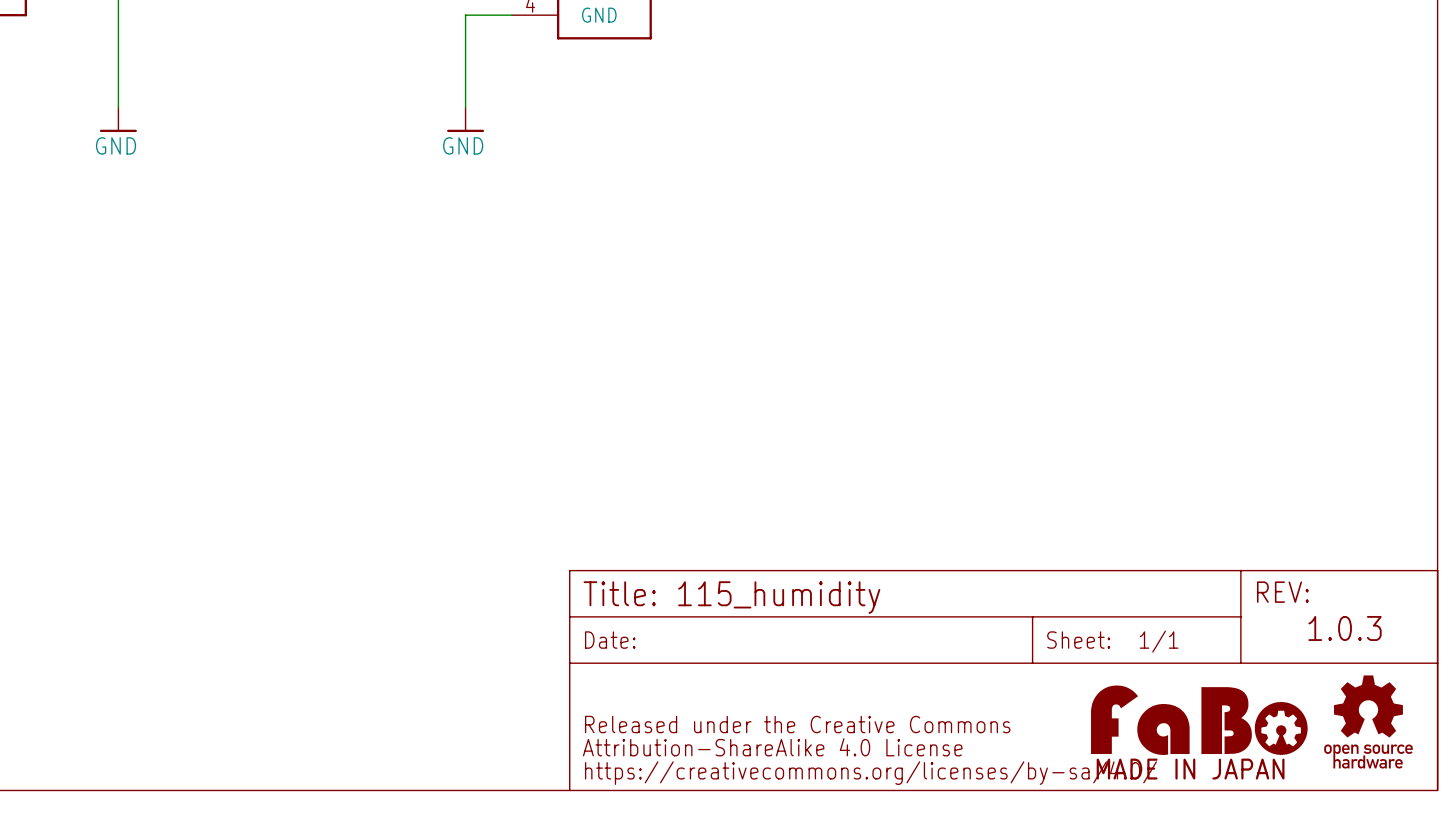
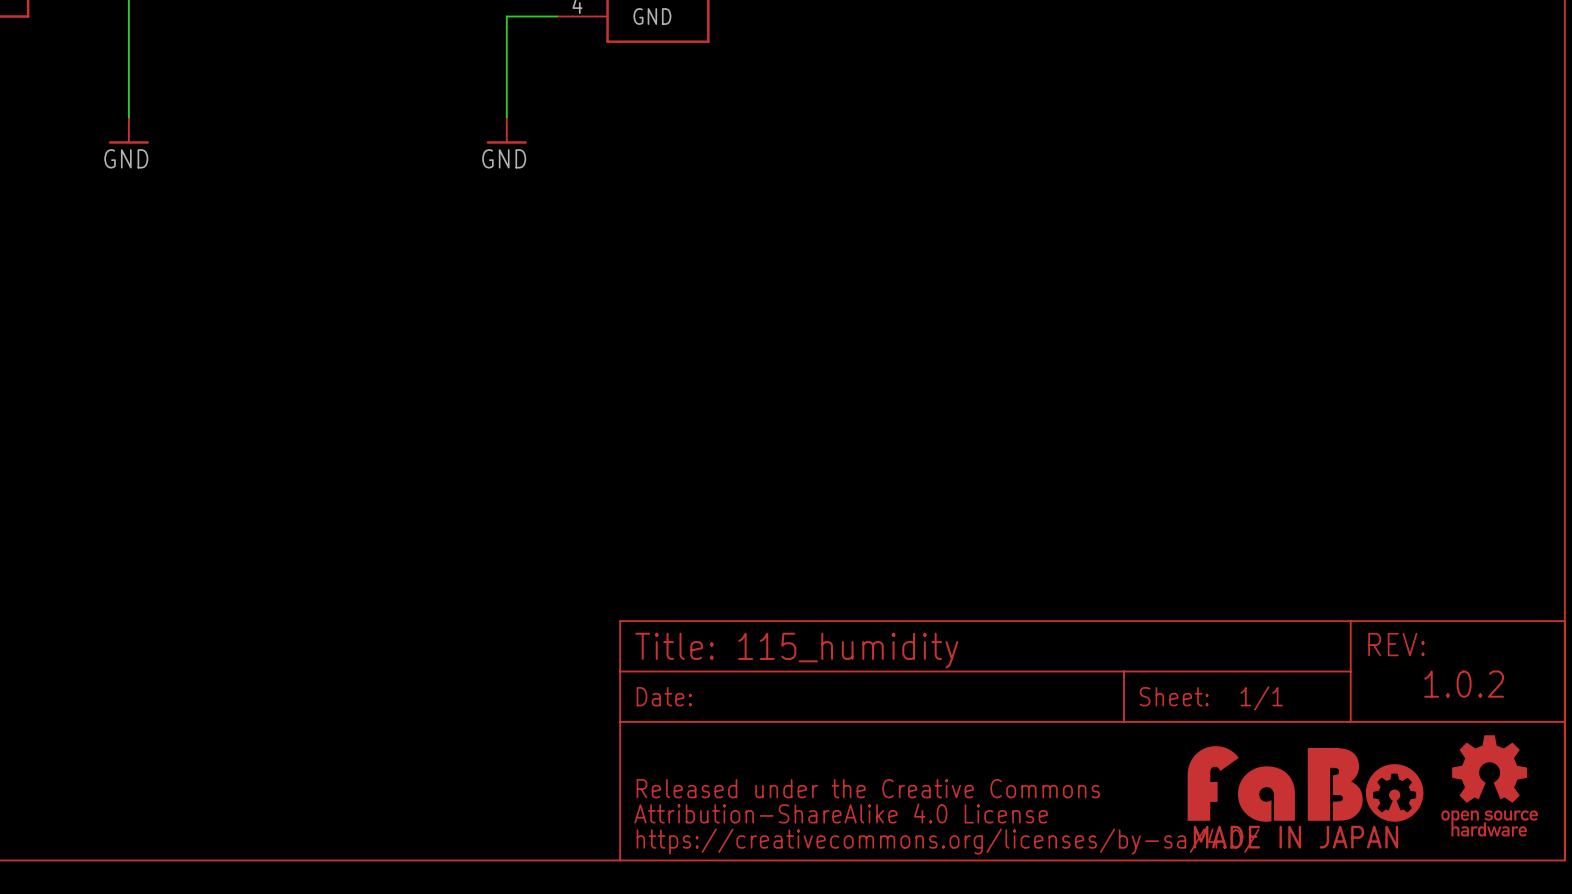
text: 1.0.3 (1345, 628) -> 1.0.2 (1464, 684)

